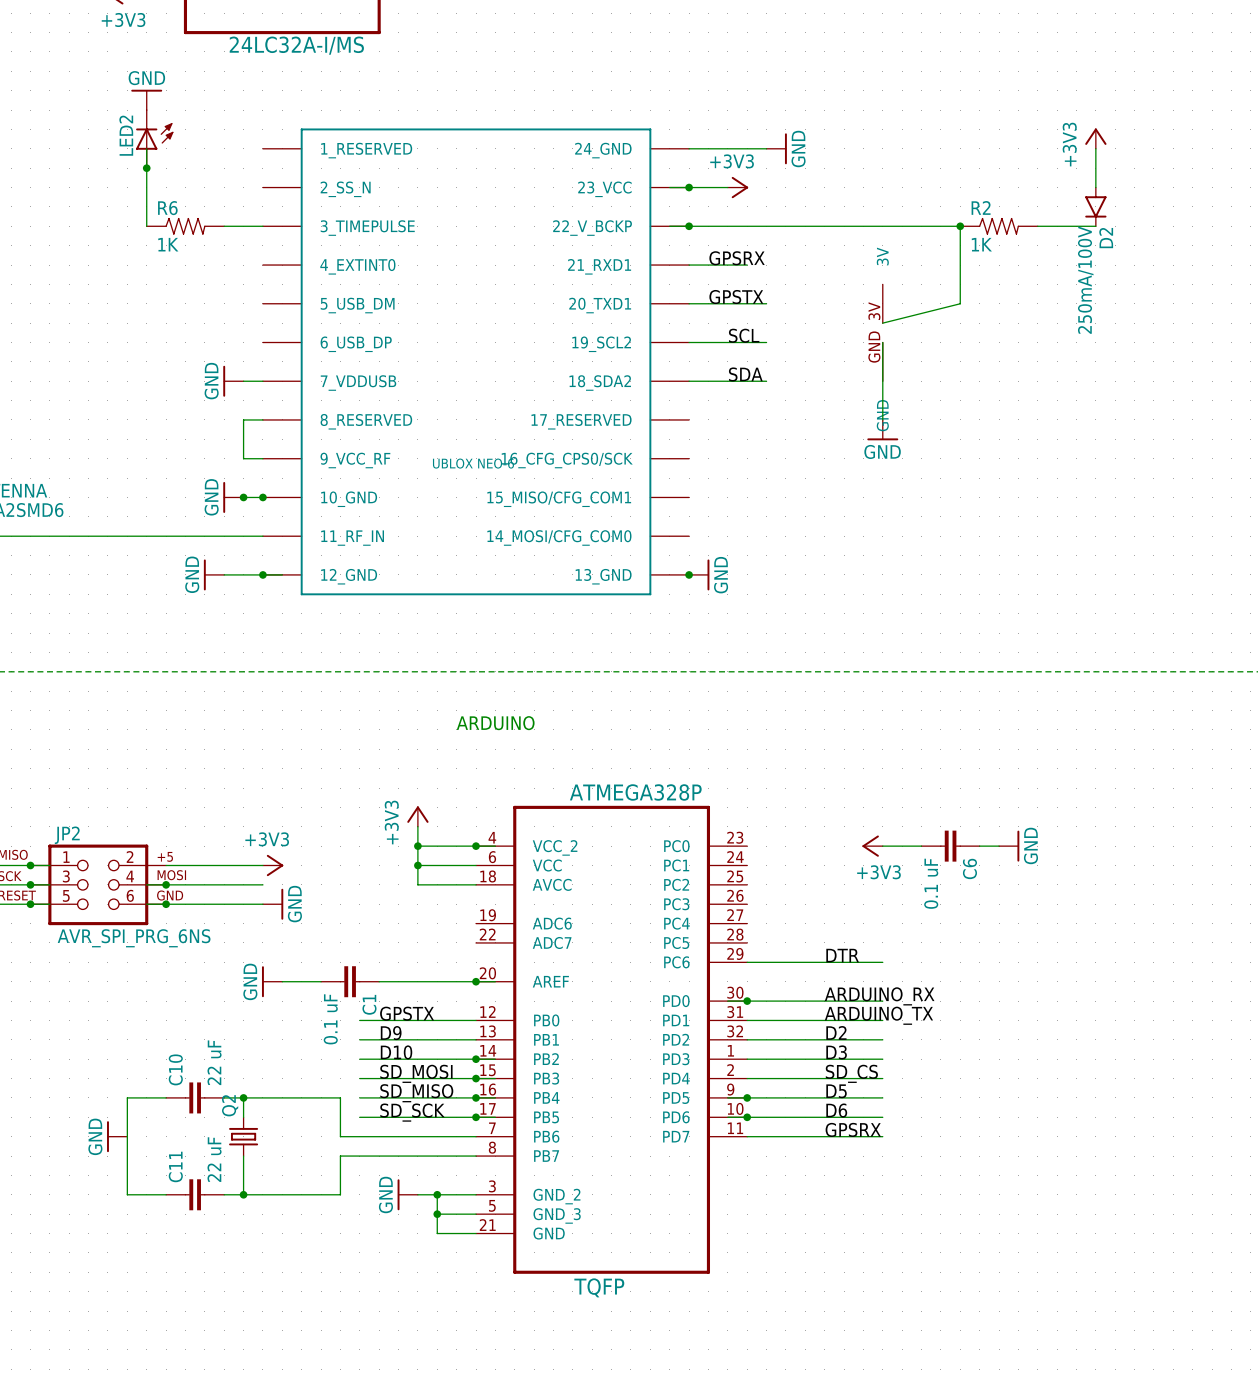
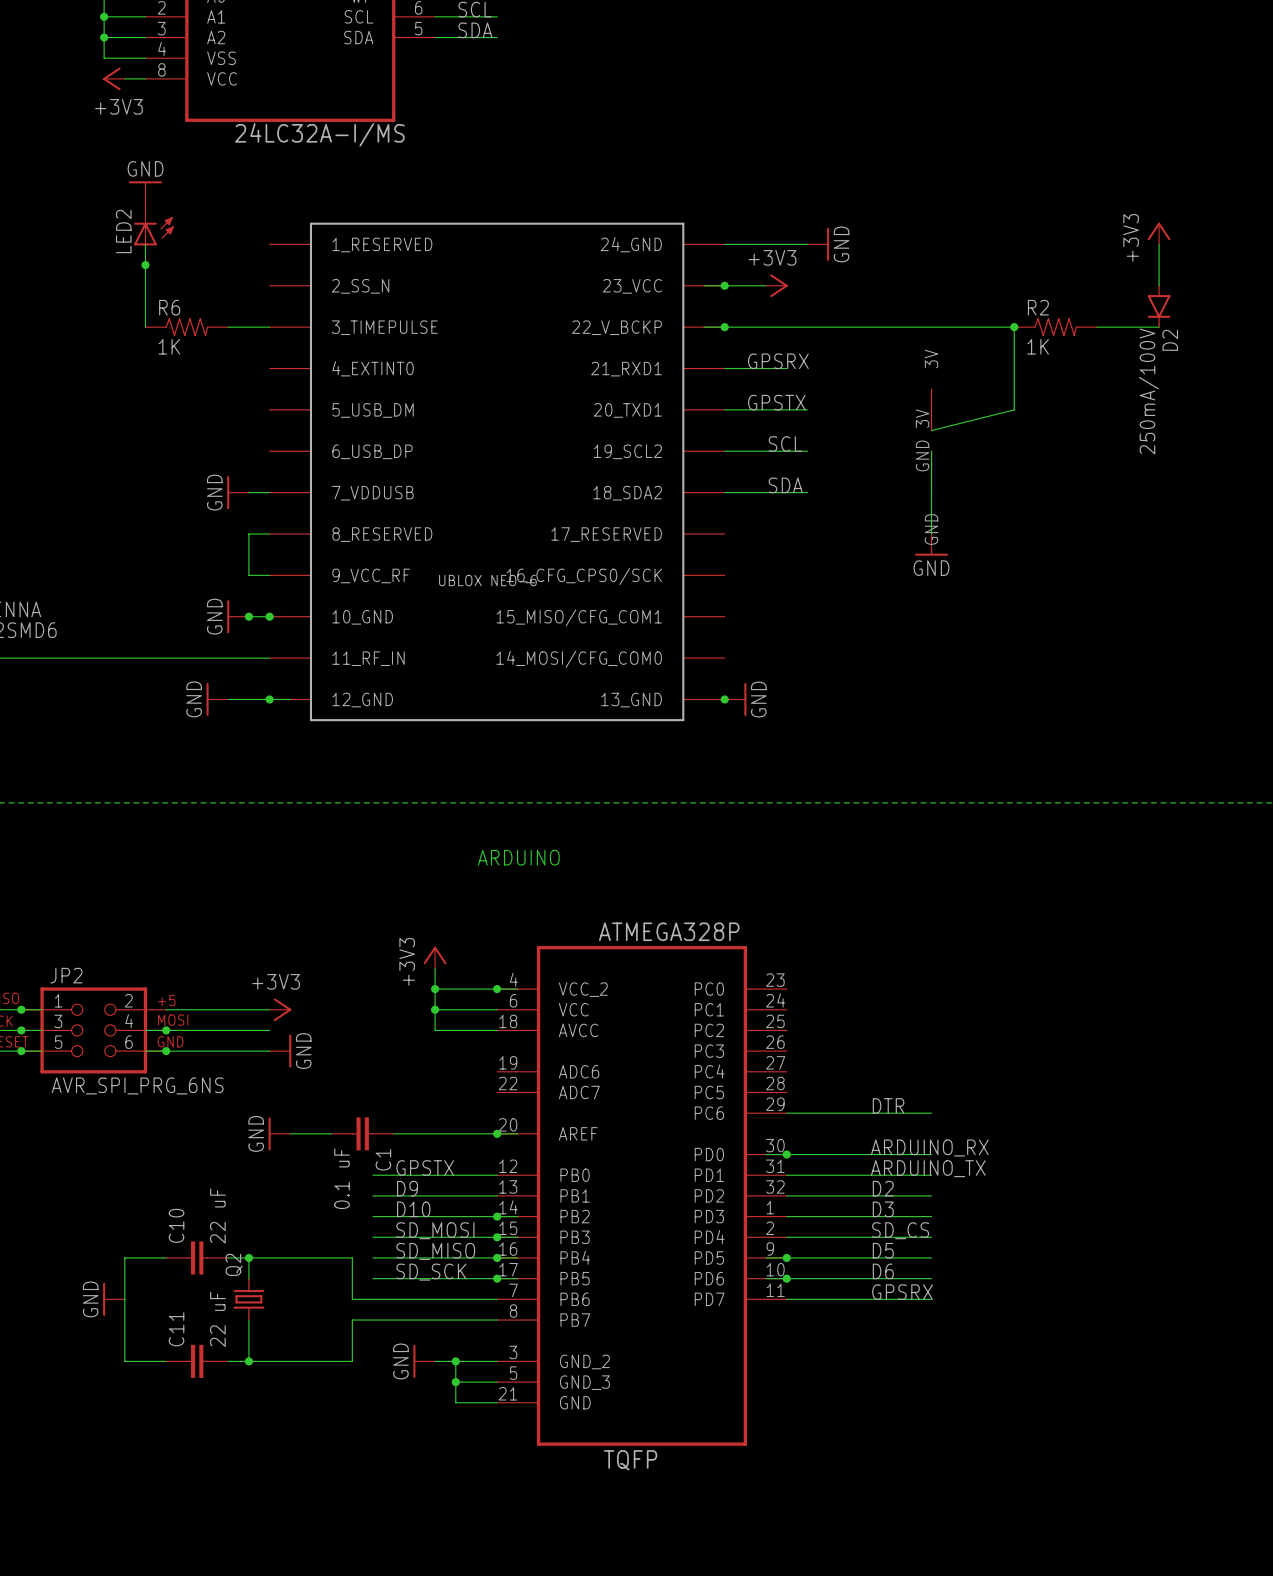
power symbol: +3V3 (872, 846) -> none
wire: (882, 846) (921, 846) -> none
C6: 0.1 uF (950, 846) -> none
wire: (979, 846) (999, 846) -> none
power symbol: GND (1009, 846) -> none

